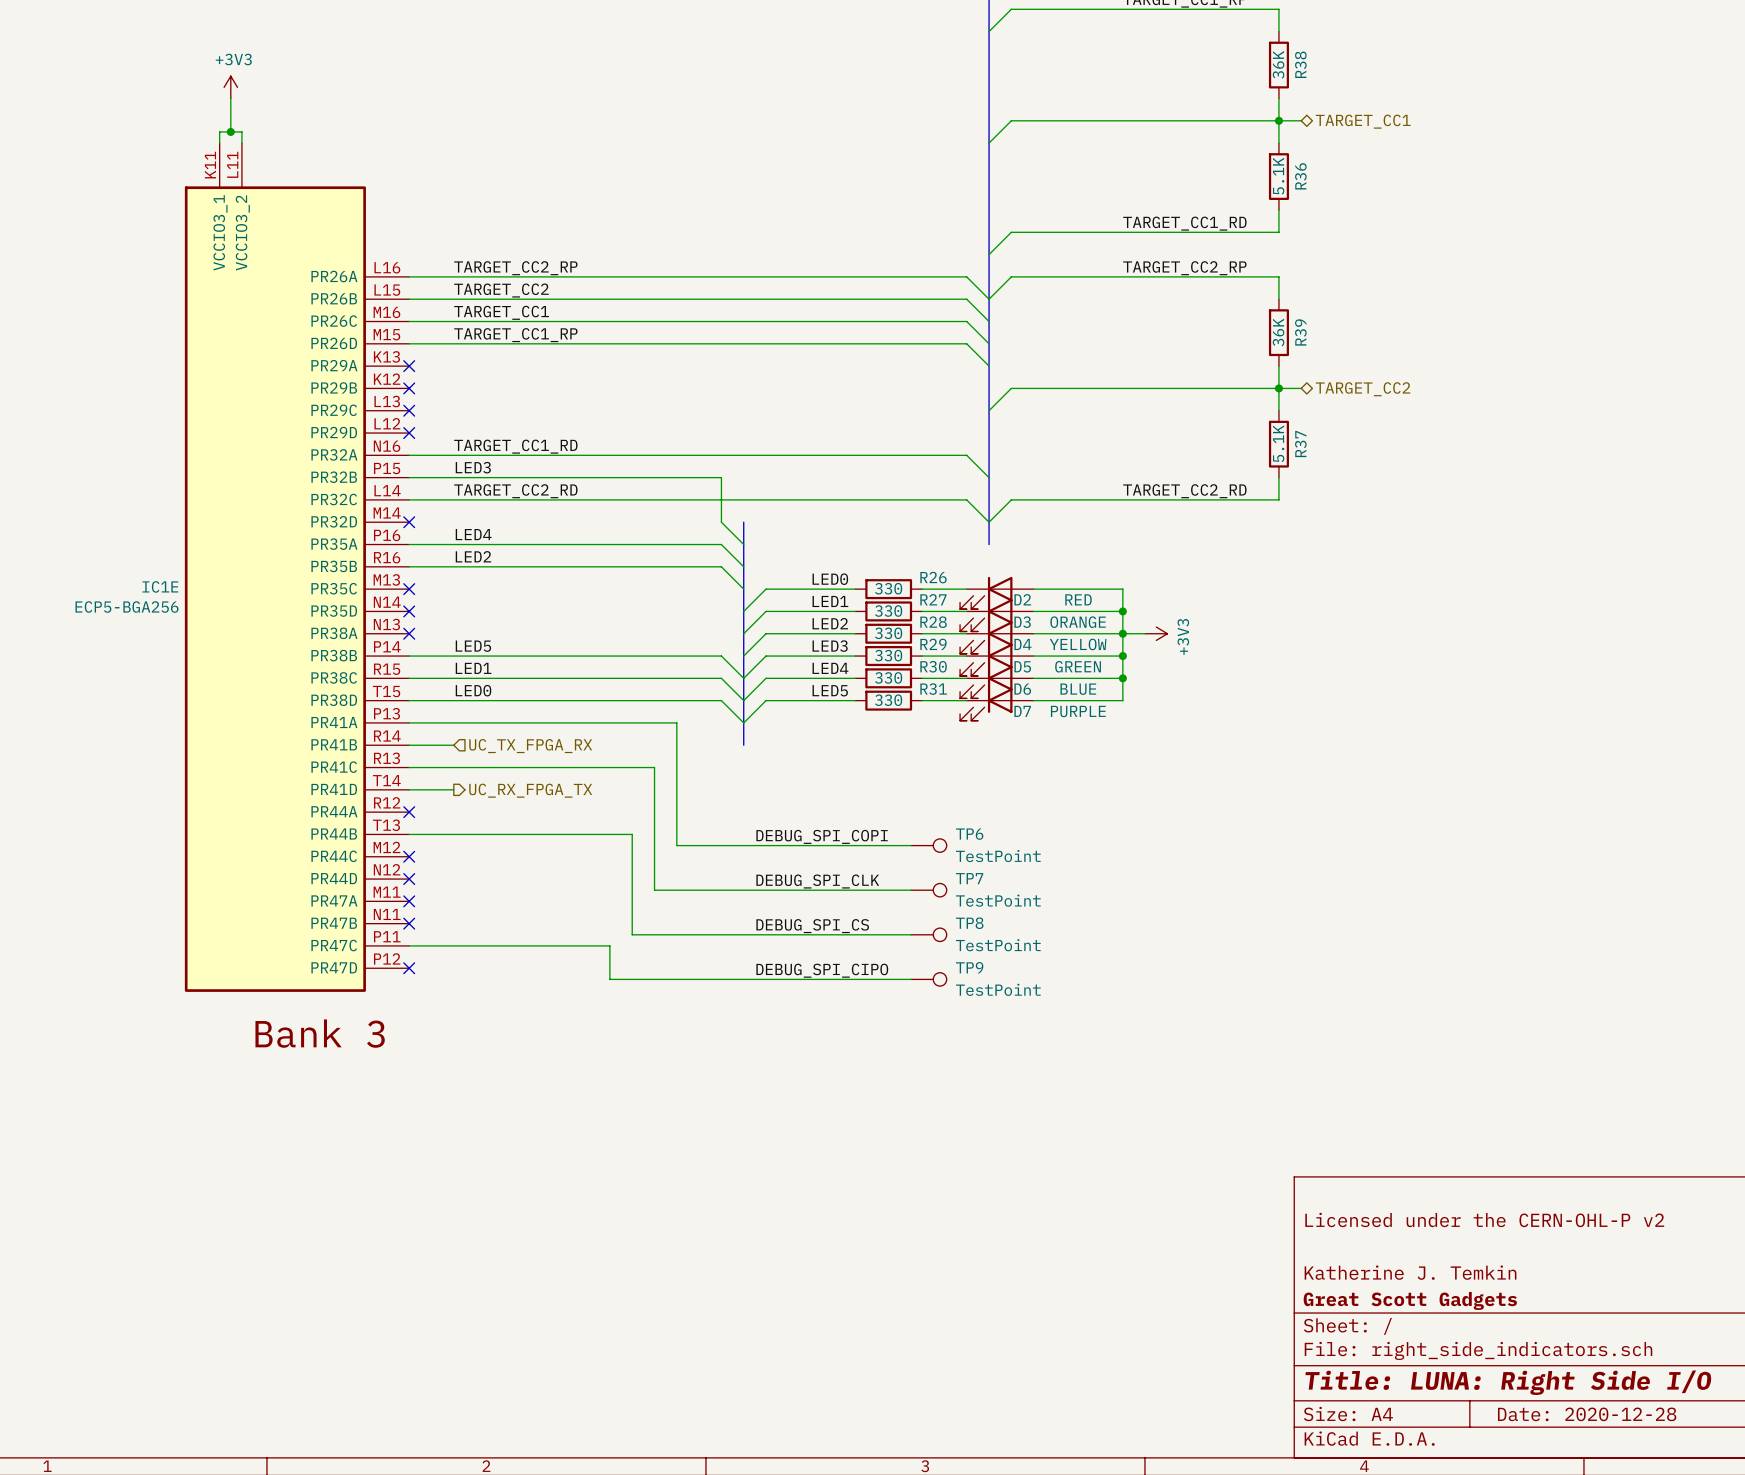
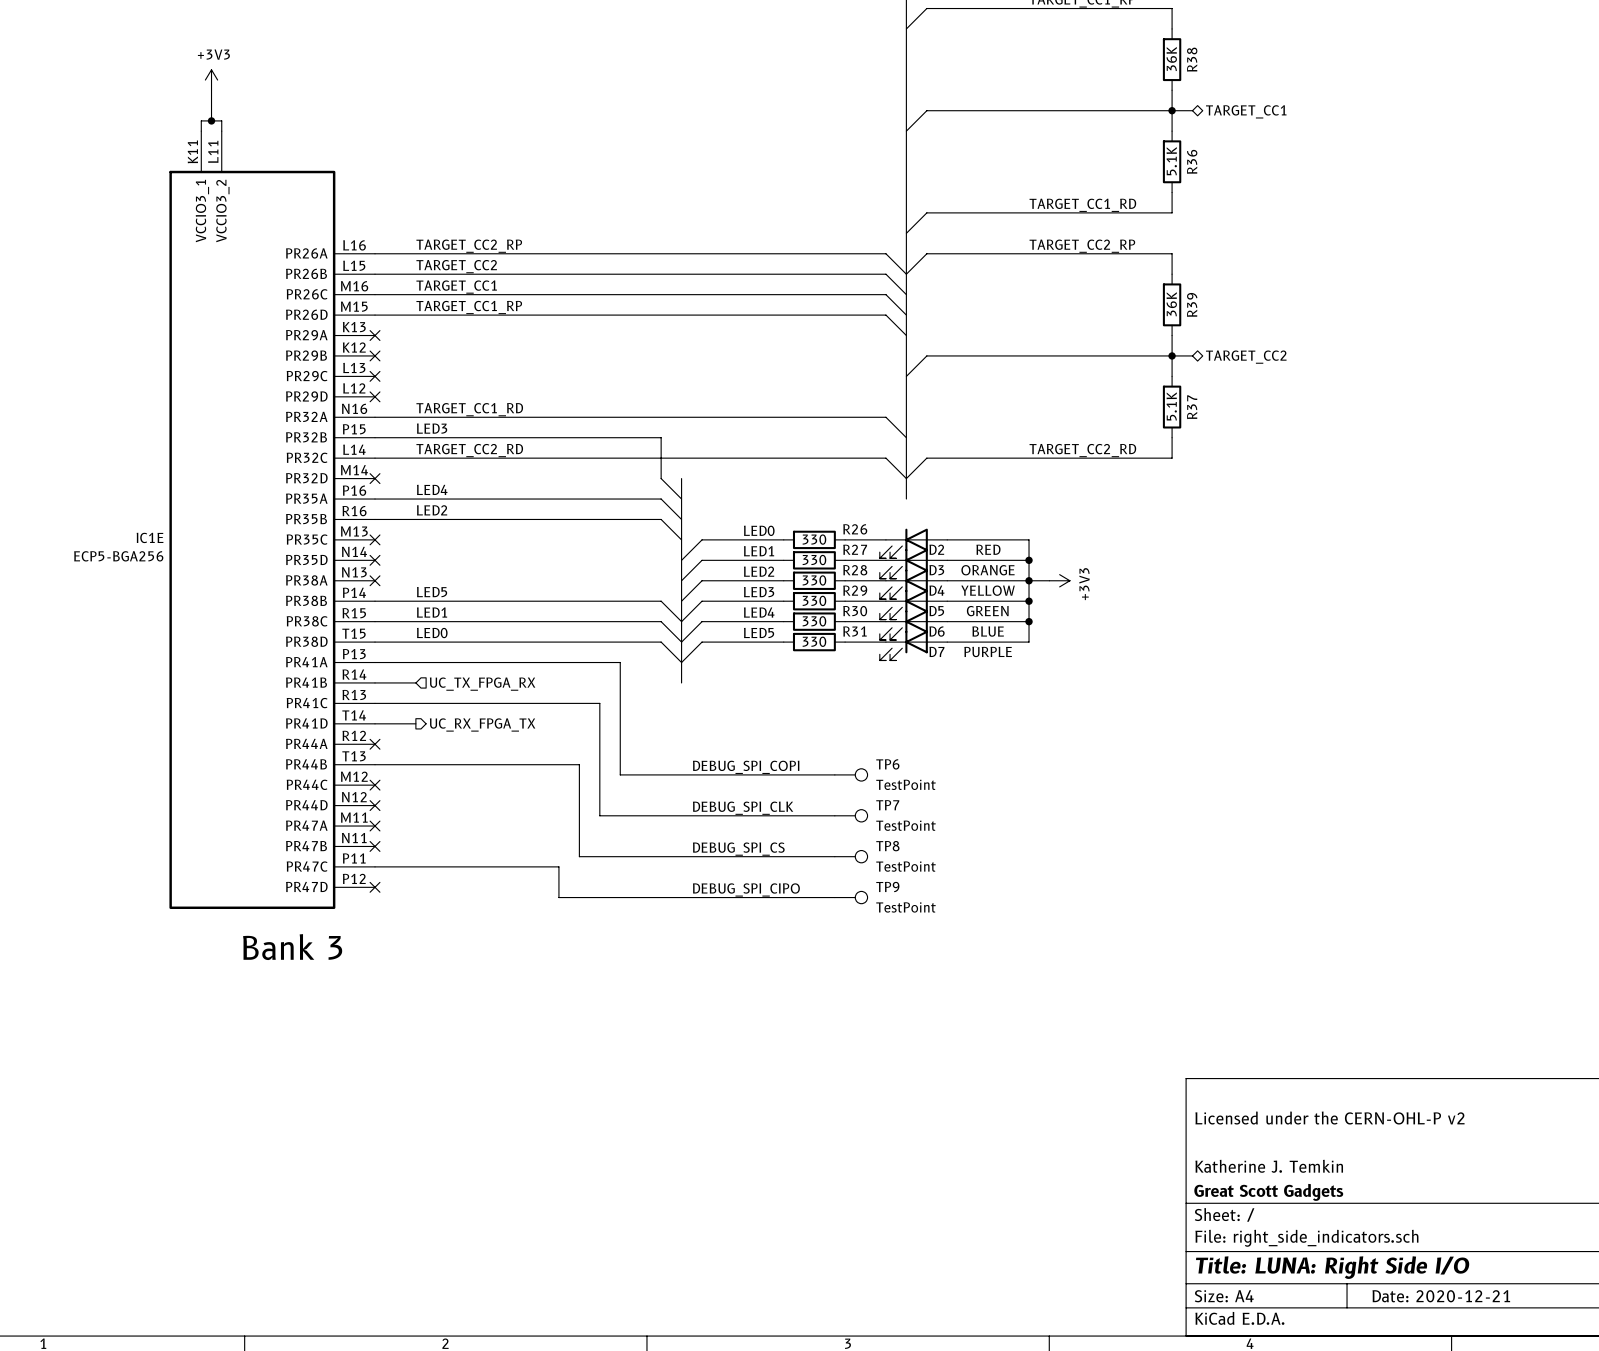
title block: Date: 2020-12-28 (1587, 1414) -> Date: 2020-12-21 (1441, 1296)

